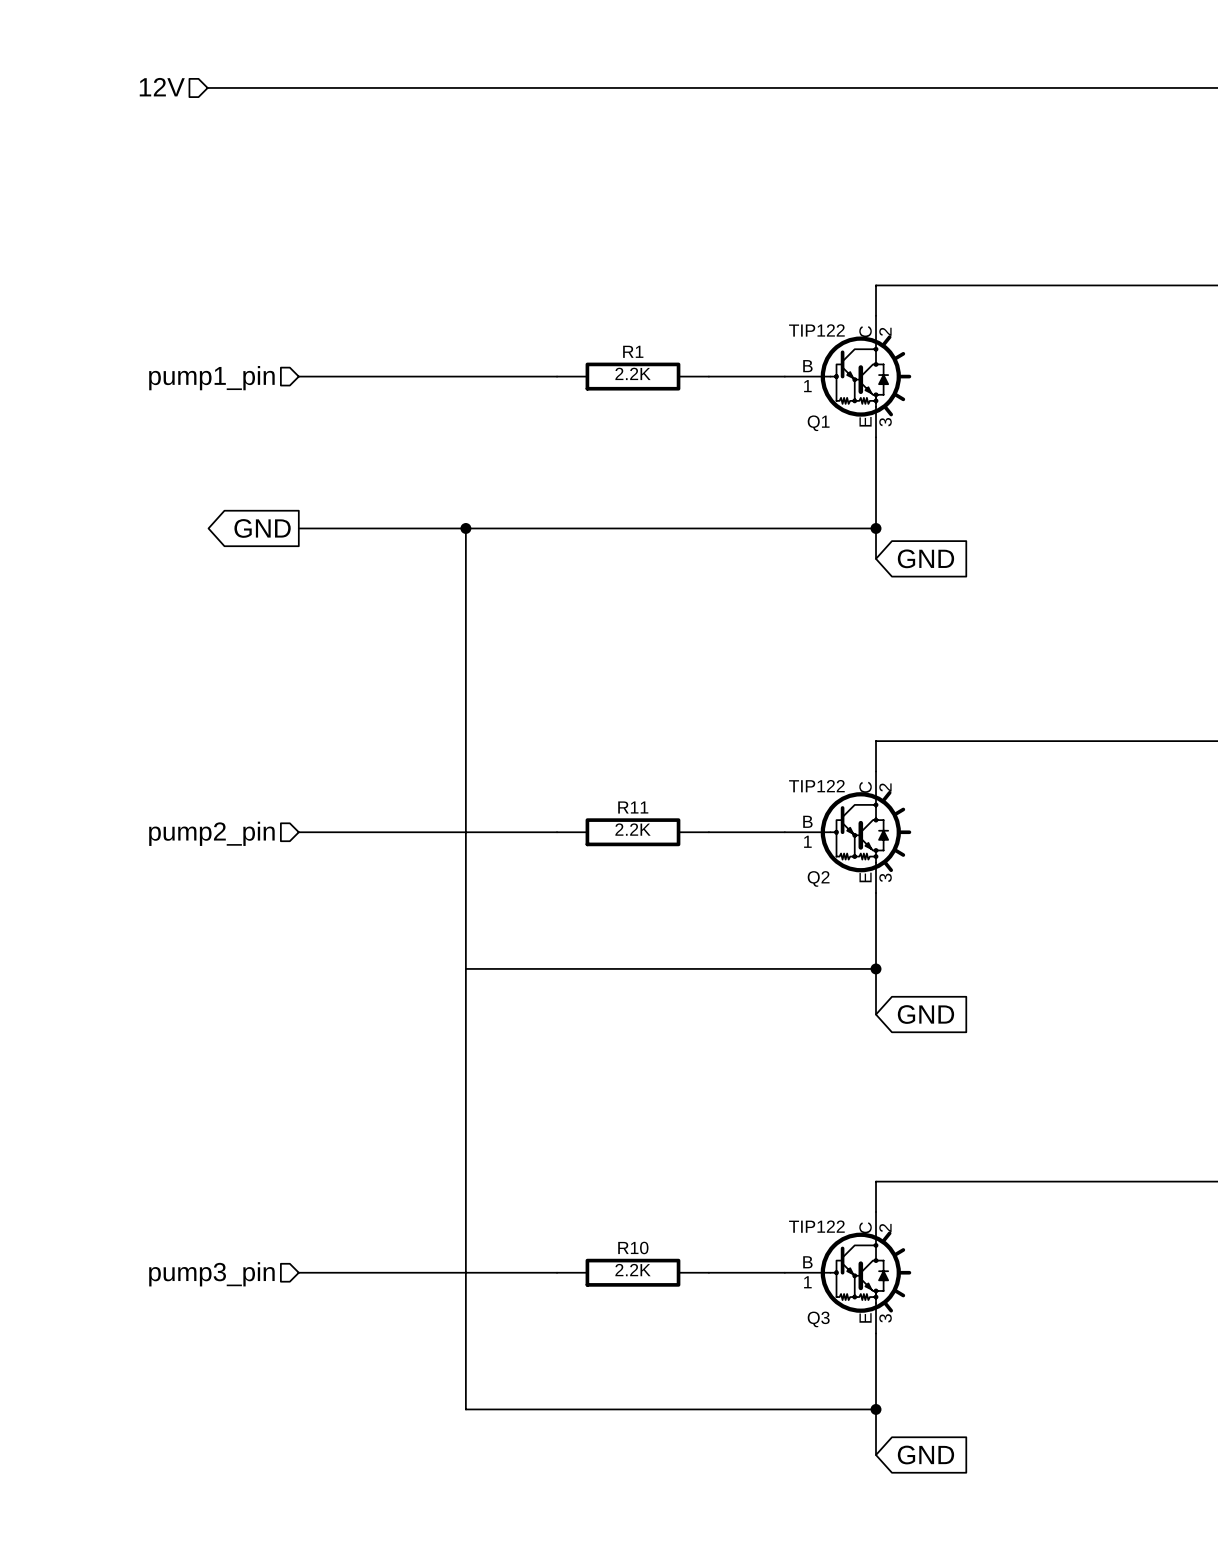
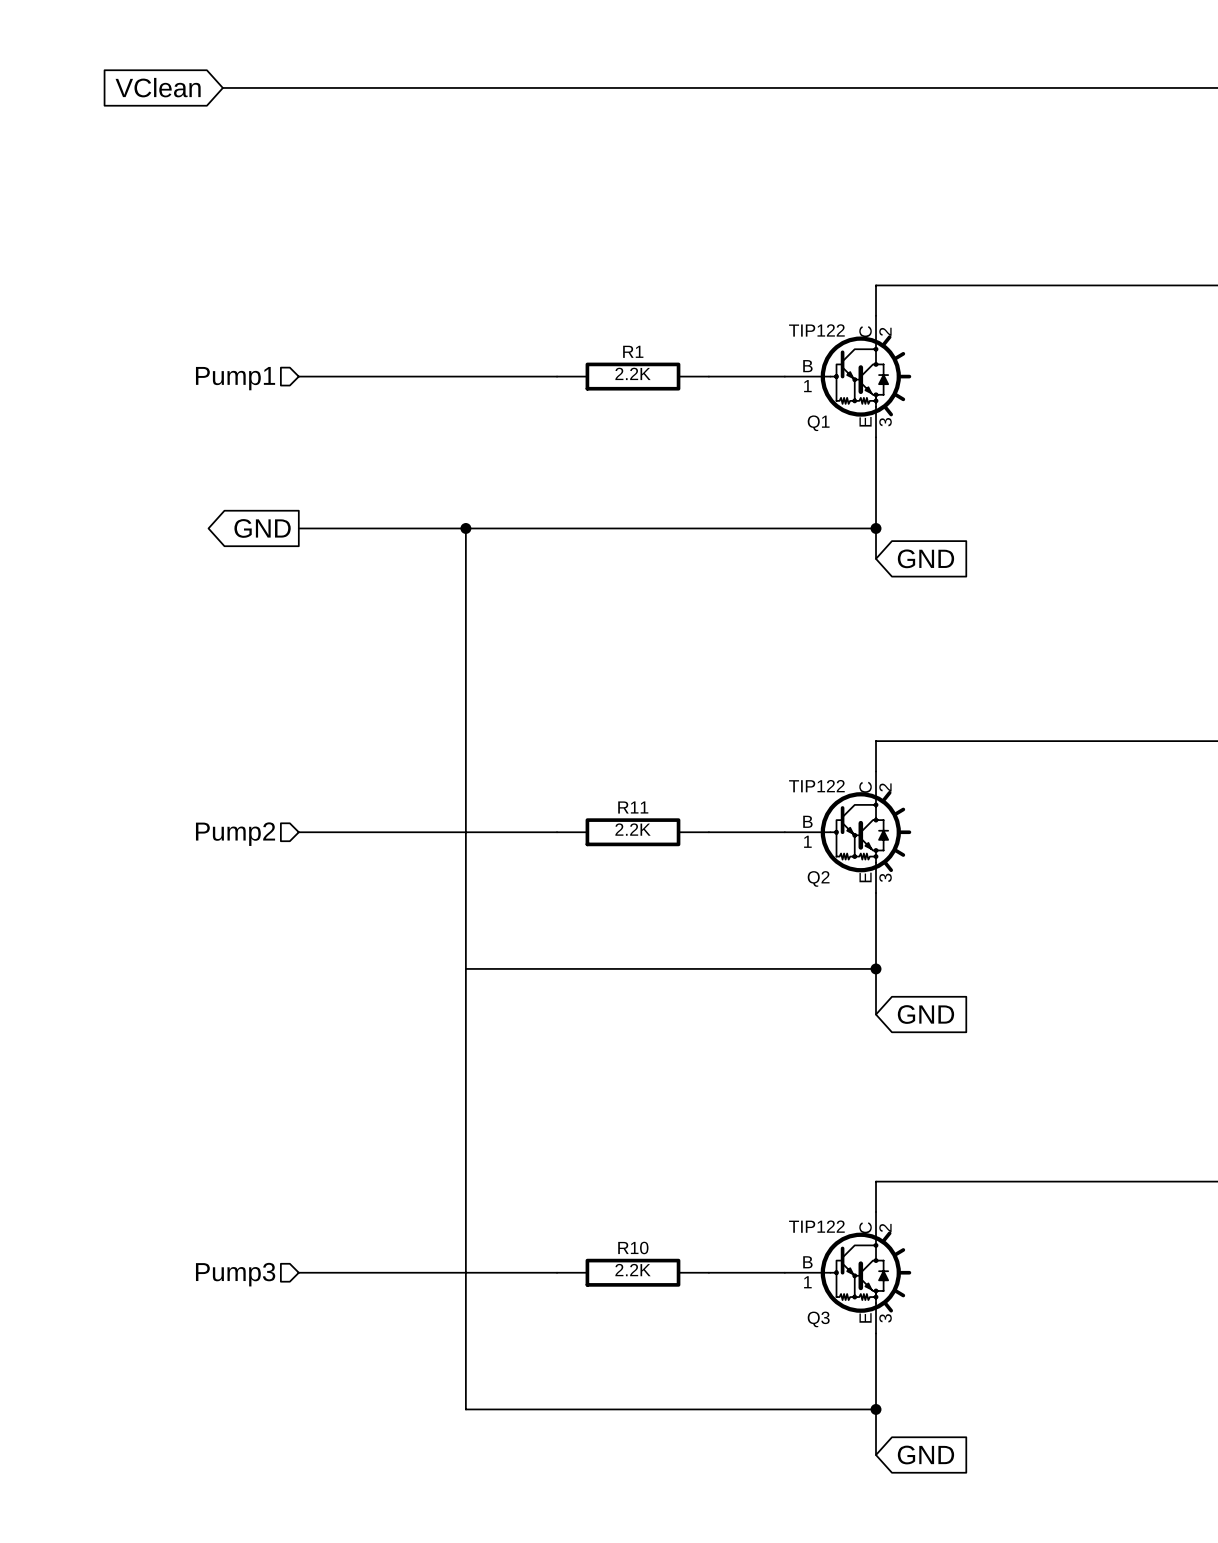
global label: none -> VClean (158, 87)
hierarchical label: 12V (162, 87) -> none
wire: (207, 87) (222, 87) -> none
hierarchical label: pump1_pin (211, 378) -> Pump1 (235, 378)
hierarchical label: pump2_pin (211, 833) -> Pump2 (235, 834)
hierarchical label: pump3_pin (211, 1274) -> Pump3 (235, 1274)

